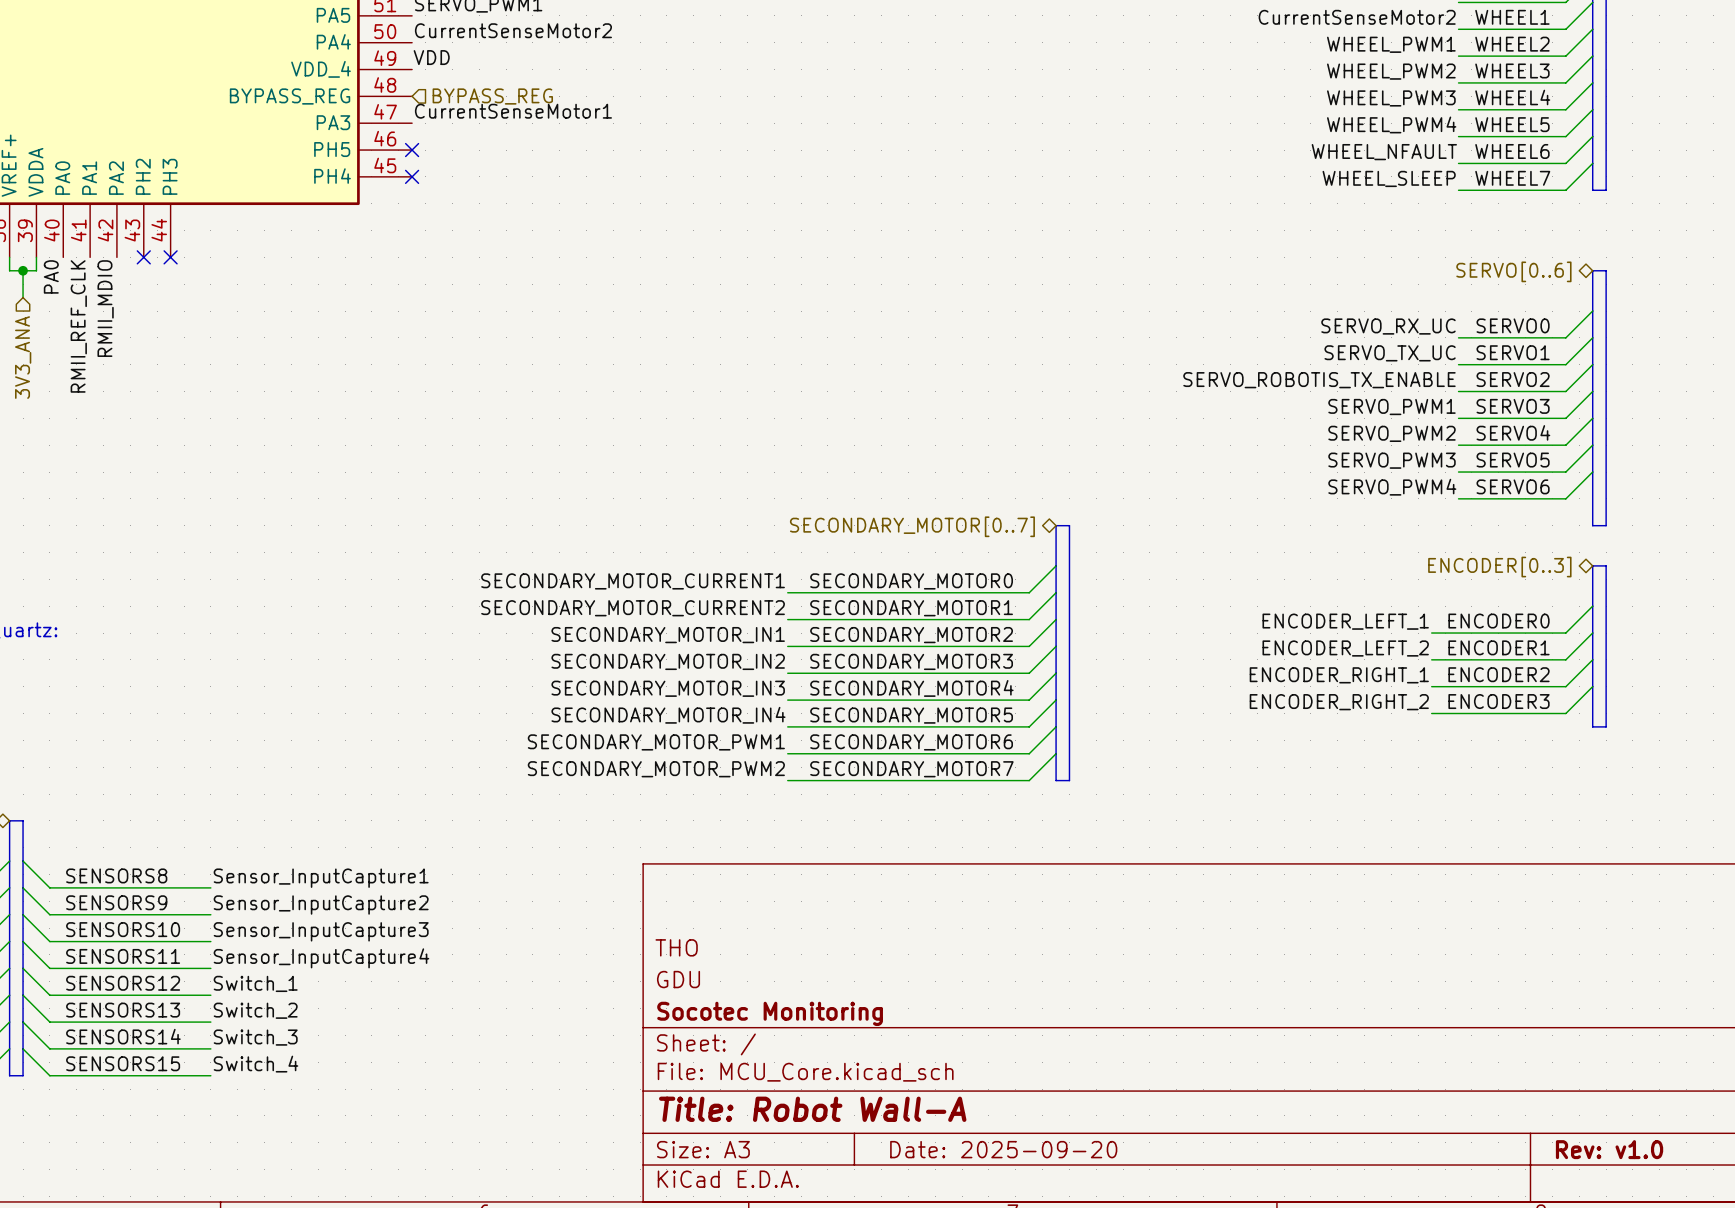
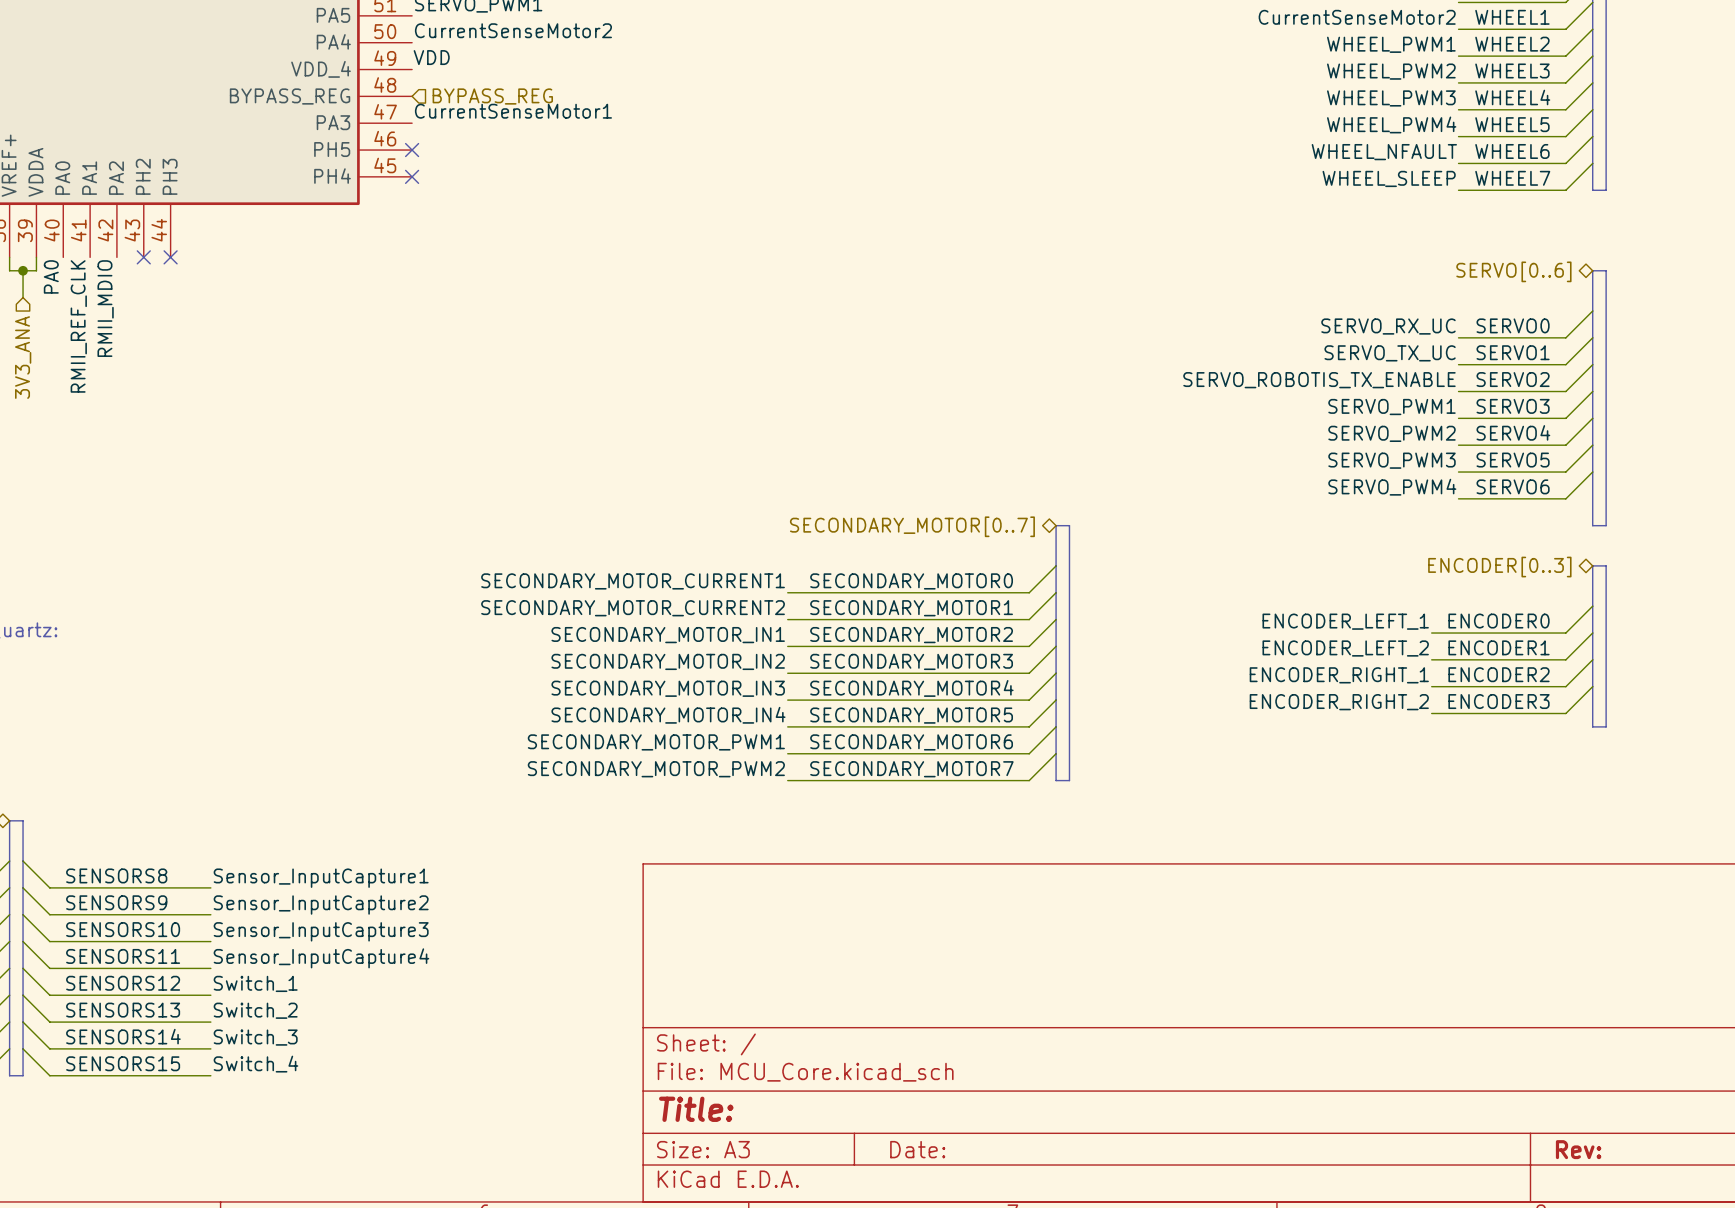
title block: THO (676, 947) -> none
title block: GDU (678, 979) -> none
title block: Socotec Monitoring (770, 1013) -> none
title block: Title: Robot Wall-A (812, 1109) -> Title: (696, 1109)
title block: Date: 2025-09-20 (1003, 1149) -> Date: (917, 1149)
title block: Rev: v1.0 (1609, 1149) -> Rev: (1578, 1149)

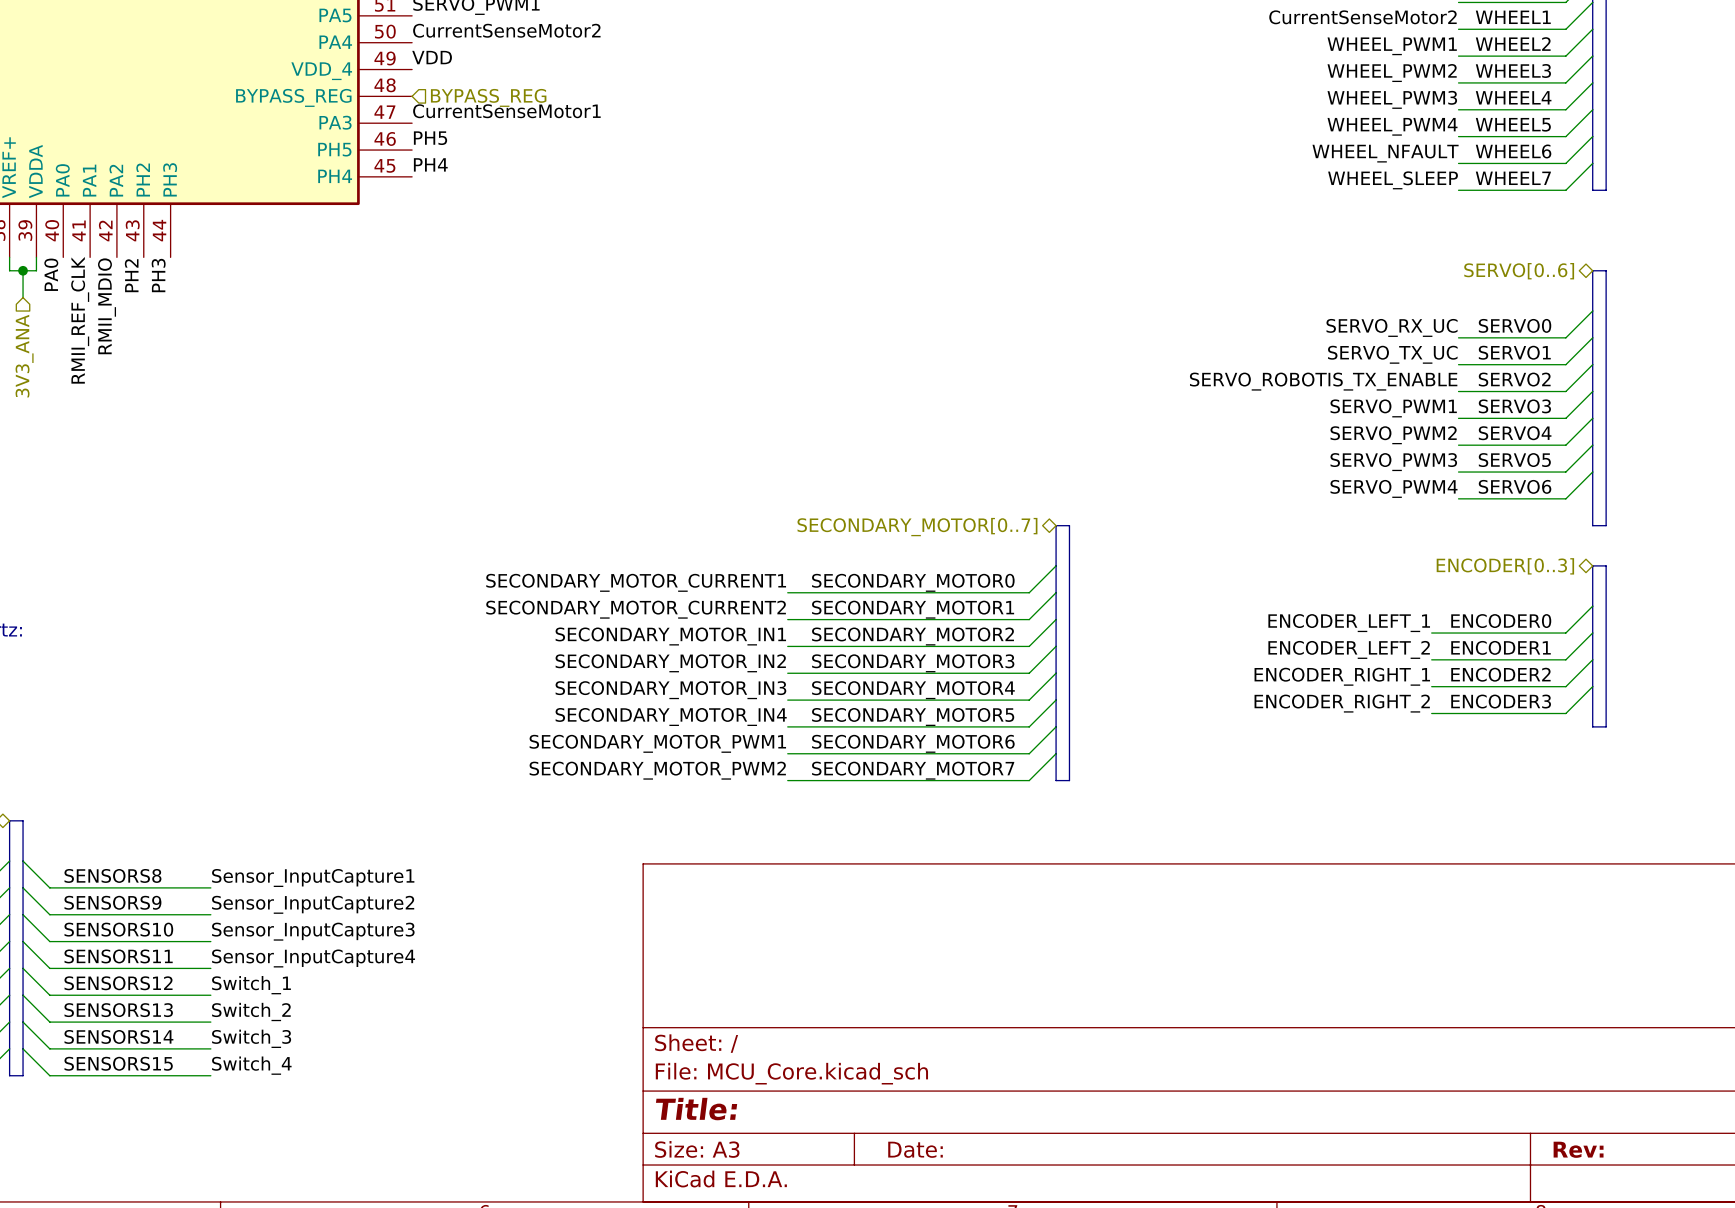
label: none -> PH5 (430, 138)
no-connect mark: (412, 150) -> none
label: none -> PH4 (430, 164)
no-connect mark: (412, 176) -> none
no-connect mark: (143, 257) -> none
no-connect mark: (170, 257) -> none
label: none -> PH2 (131, 275)
label: none -> PH3 (158, 275)

